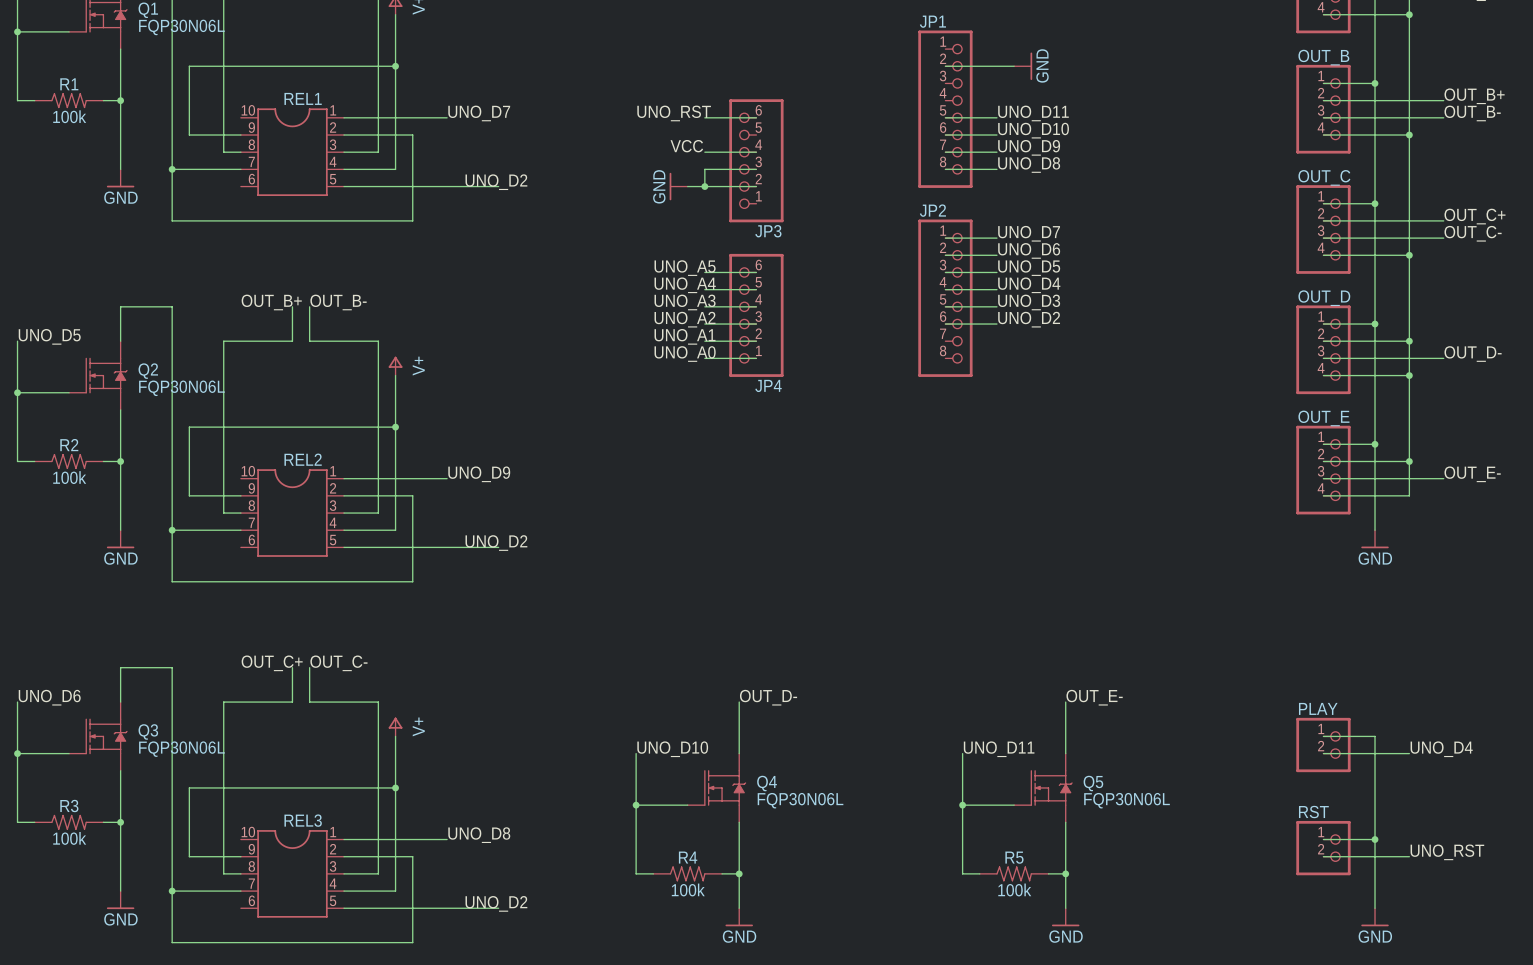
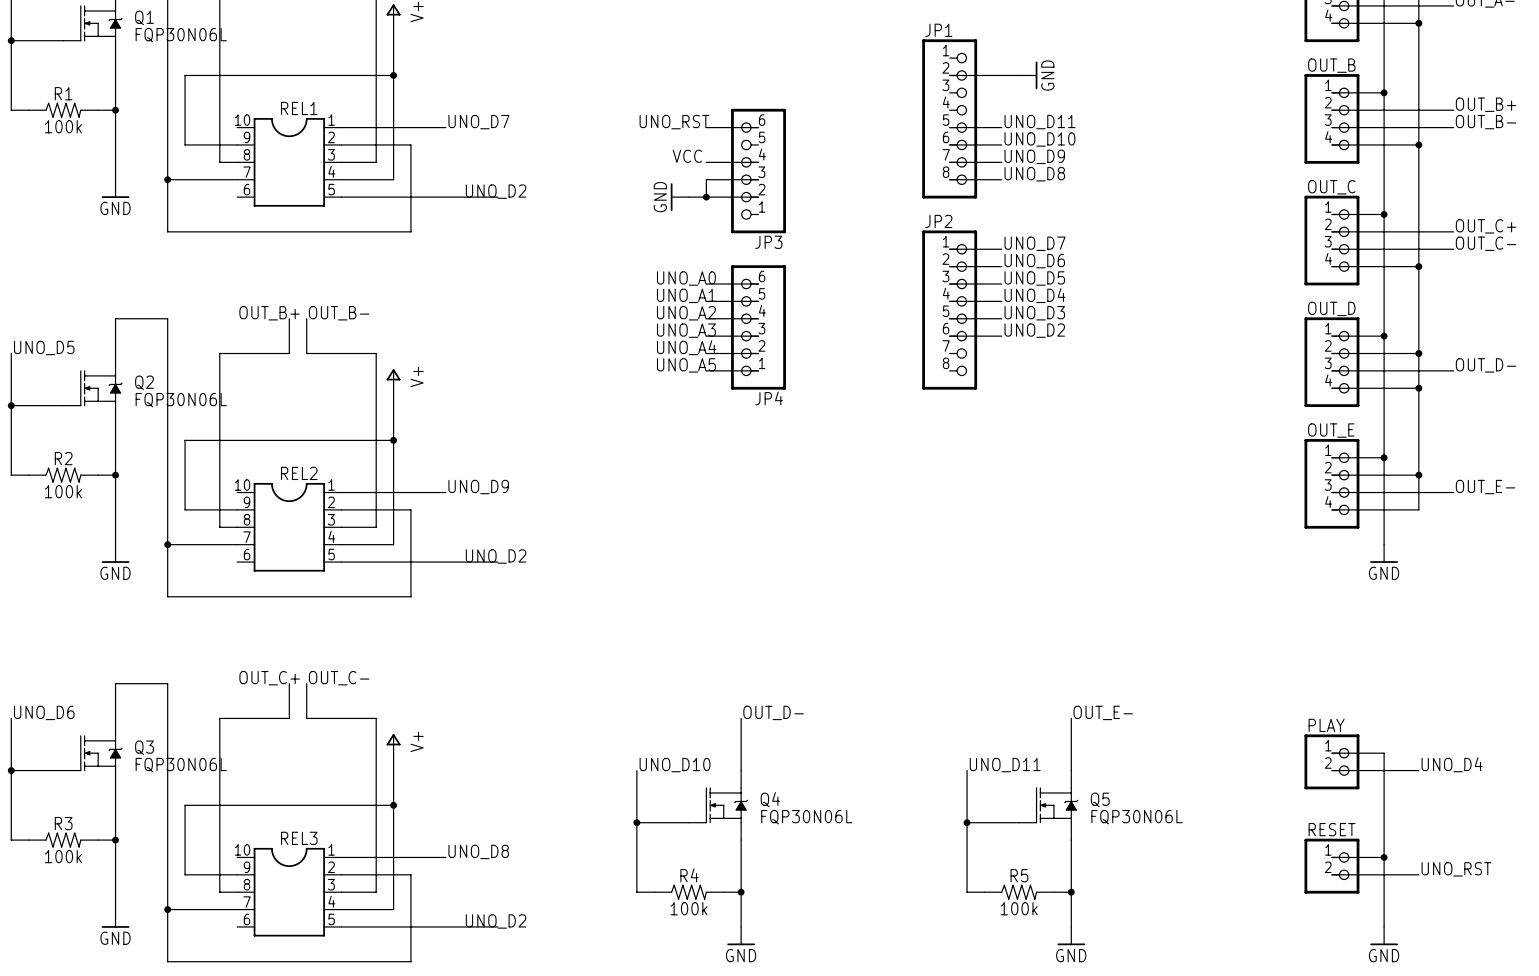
label: UNO_A5 (685, 268) -> UNO_A0 (686, 278)
label: UNO_A4 (685, 285) -> UNO_A1 (686, 295)
label: UNO_A3 (685, 302) -> UNO_A2 (686, 313)
label: UNO_A2 (685, 319) -> UNO_A3 (686, 330)
label: UNO_A1 (685, 336) -> UNO_A4 (686, 347)
label: UNO_A0 (685, 354) -> UNO_A5 (686, 365)
RST name: RST (1313, 812) -> RESET (1332, 829)

